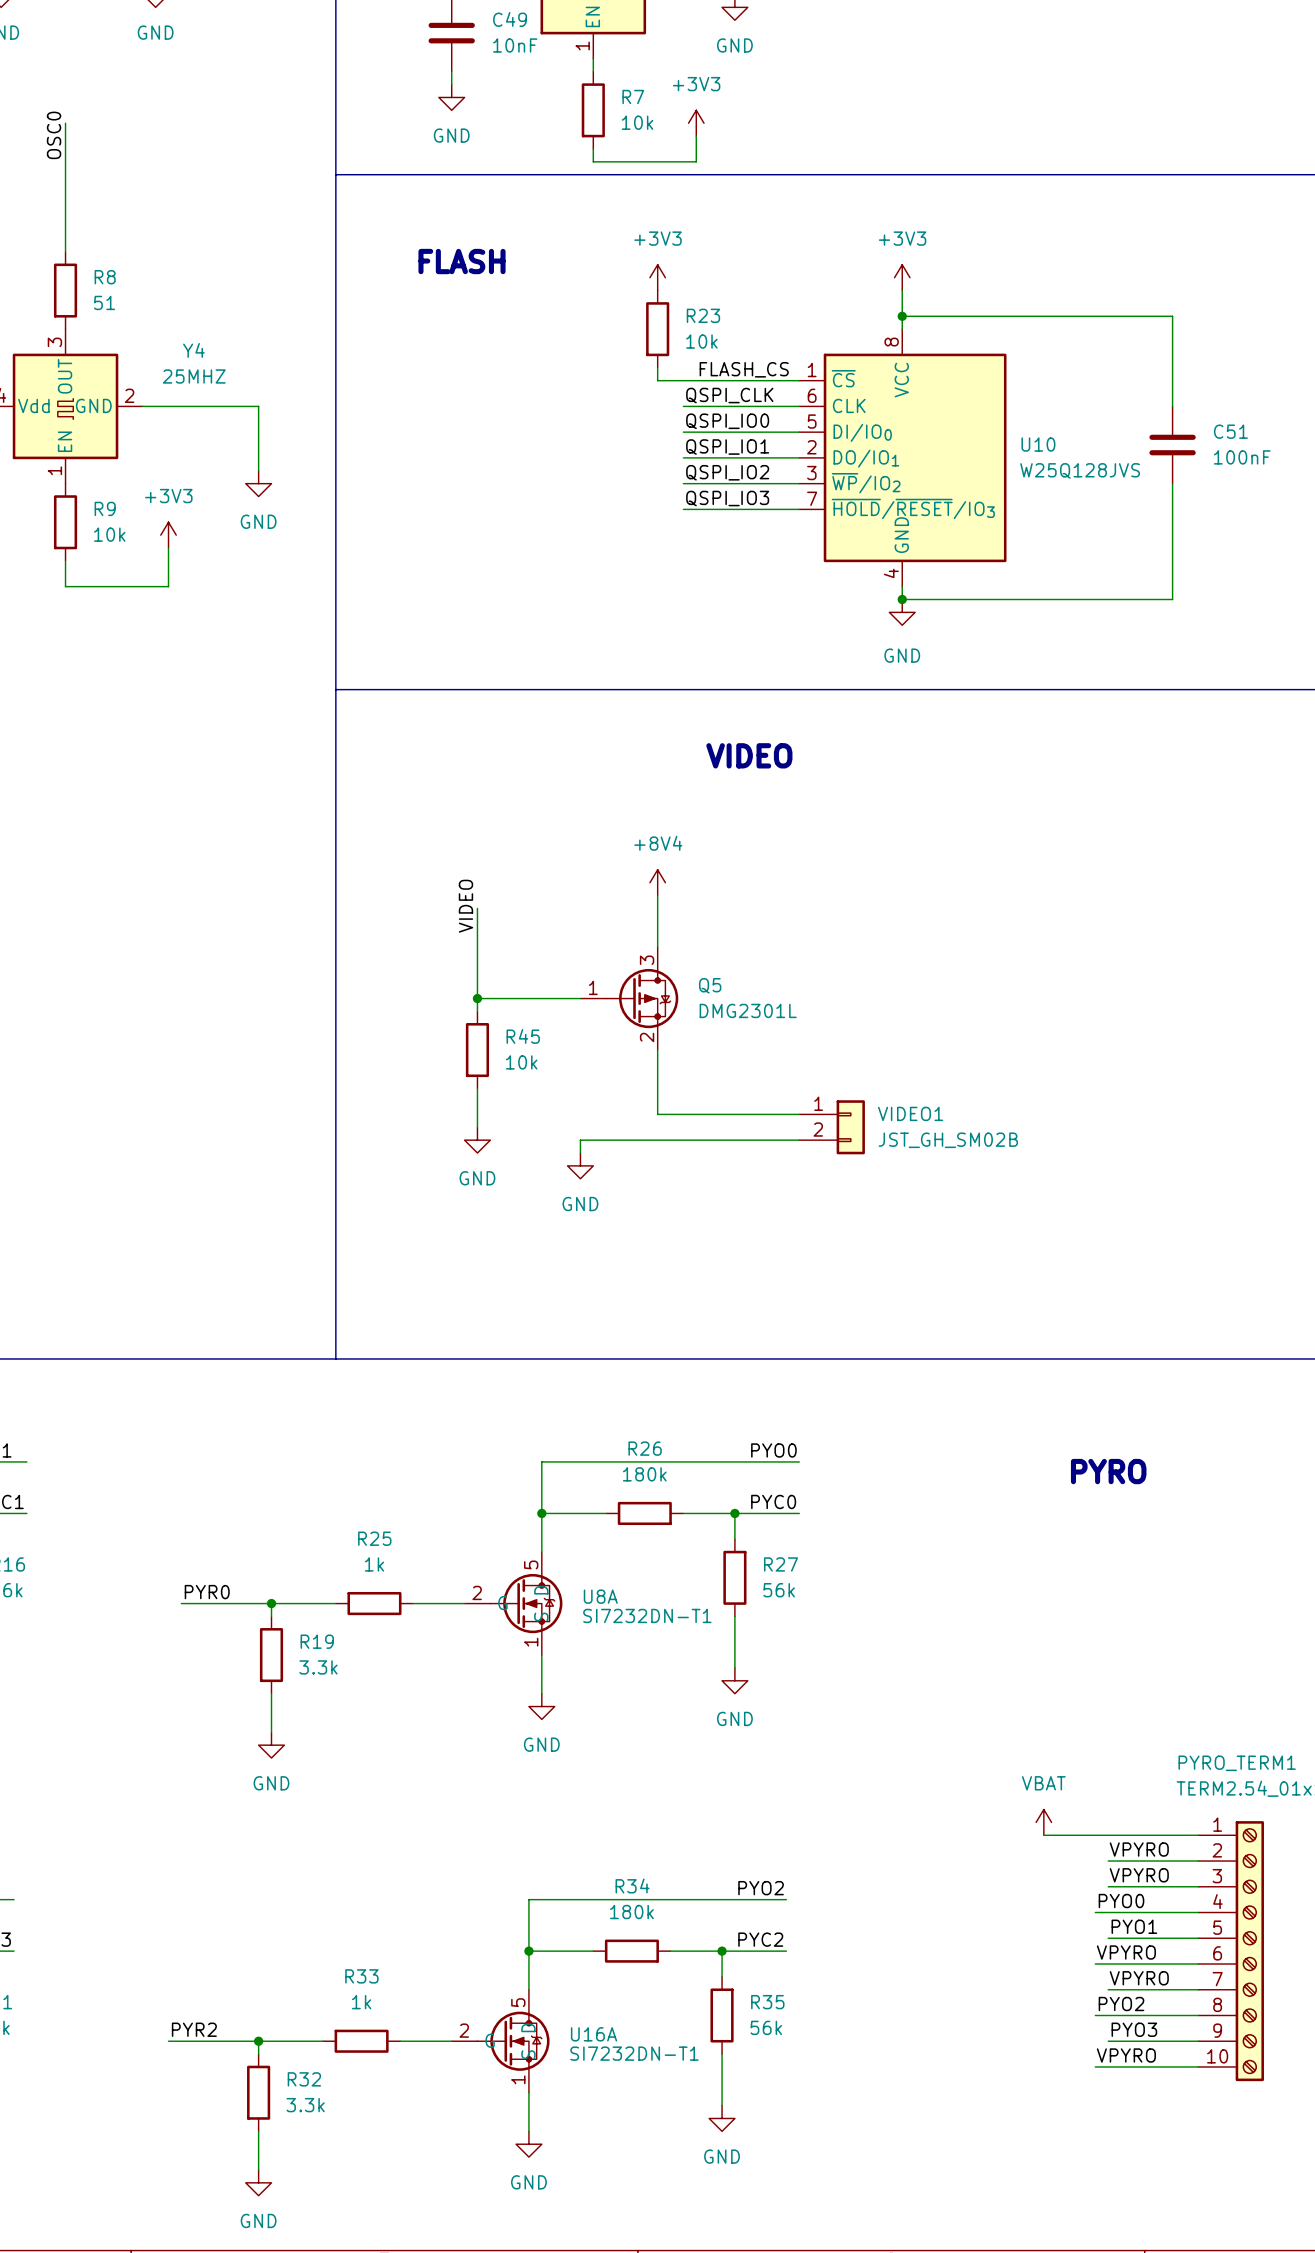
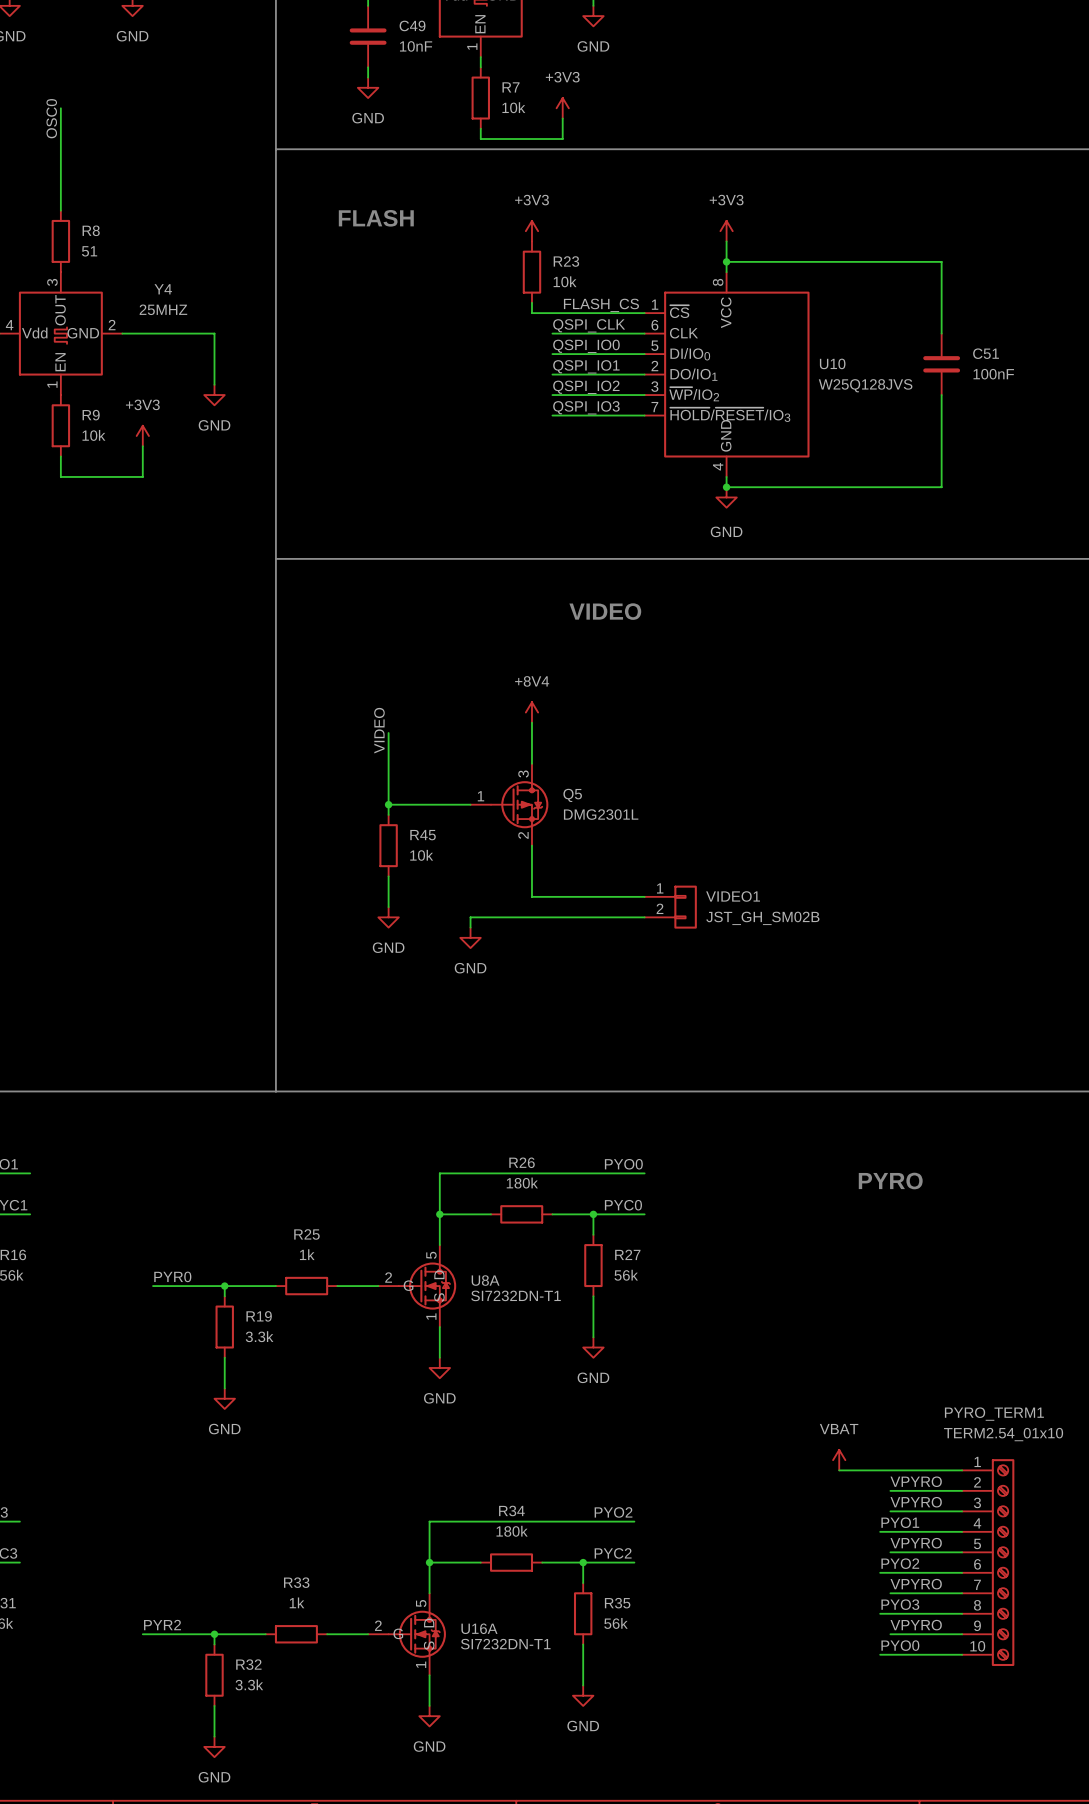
label: PYO0 (1121, 1901) -> PYO1 (900, 1522)
label: PYO1 (1134, 1926) -> VPYRO (916, 1543)
label: VPYRO (1126, 1952) -> PYO2 (900, 1563)
label: PYO2 (1121, 2004) -> PYO3 (900, 1604)
label: PYO3 (1134, 2029) -> VPYRO (916, 1625)
label: VPYRO (1126, 2055) -> PYO0 (900, 1645)

